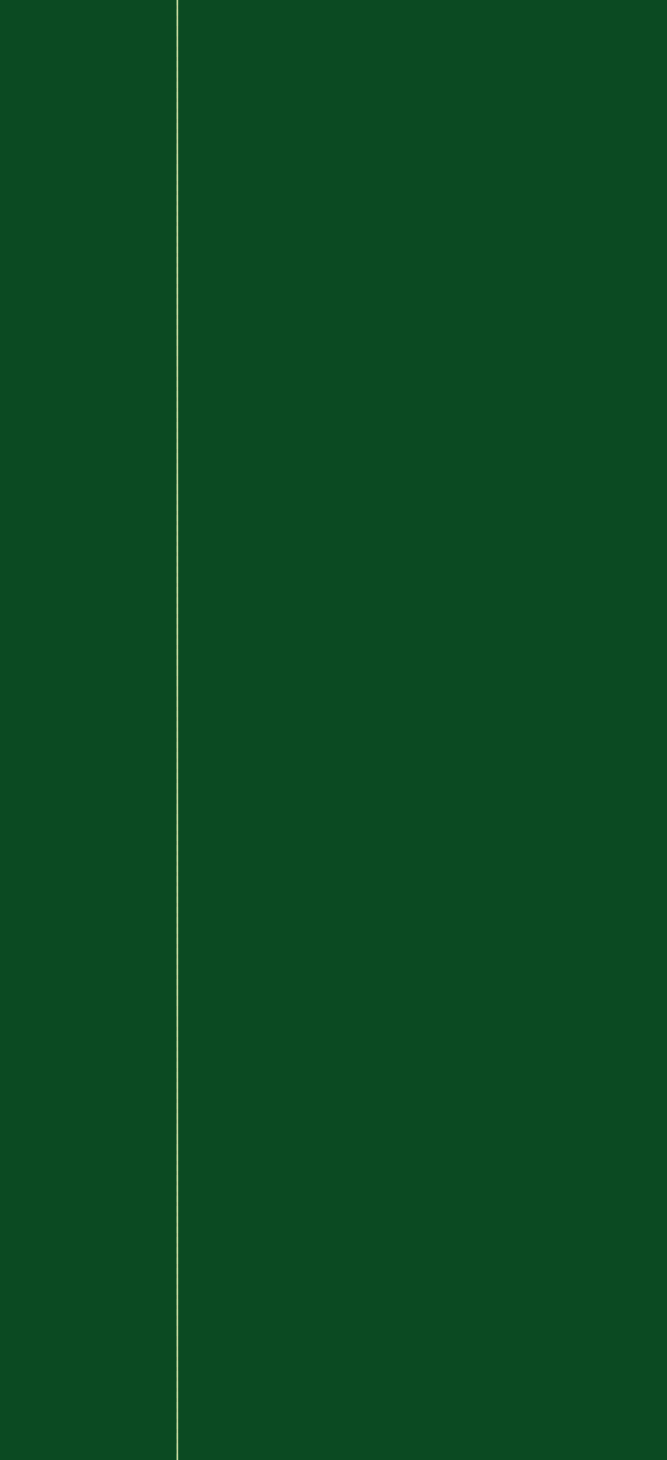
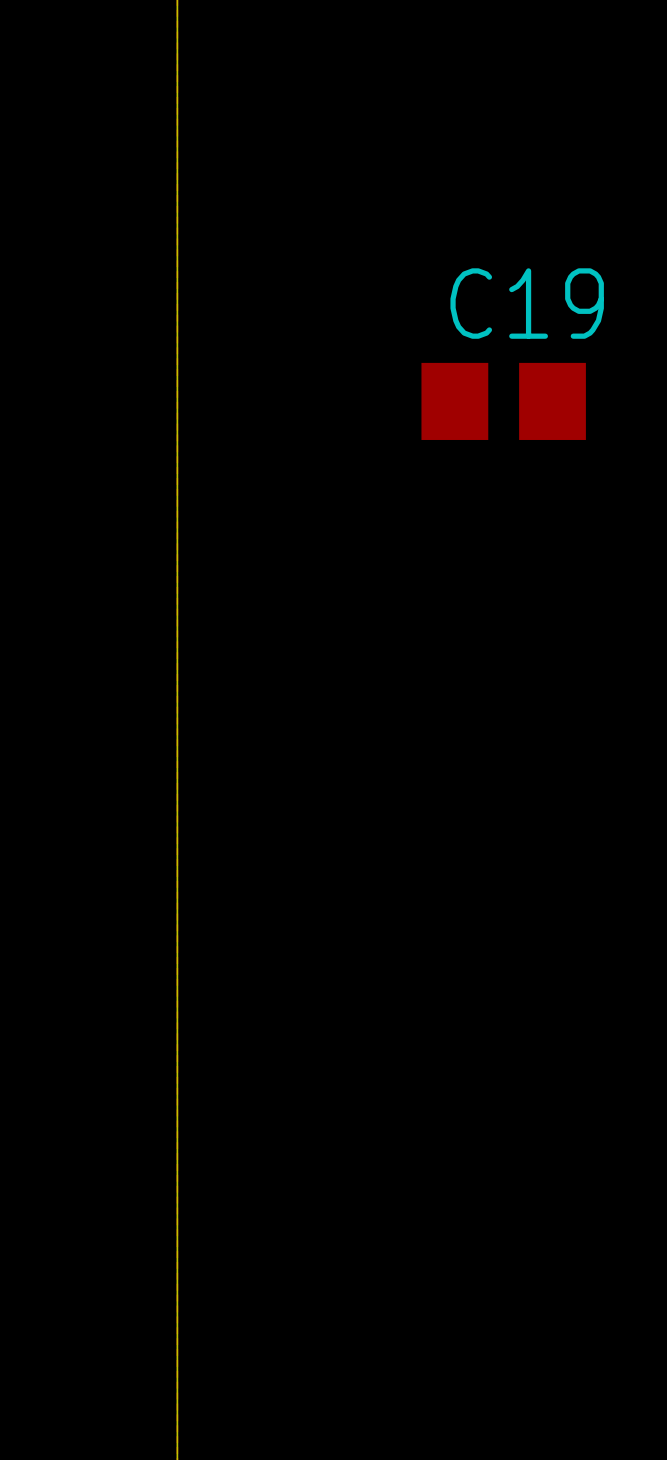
C19: none -> (503, 401)

